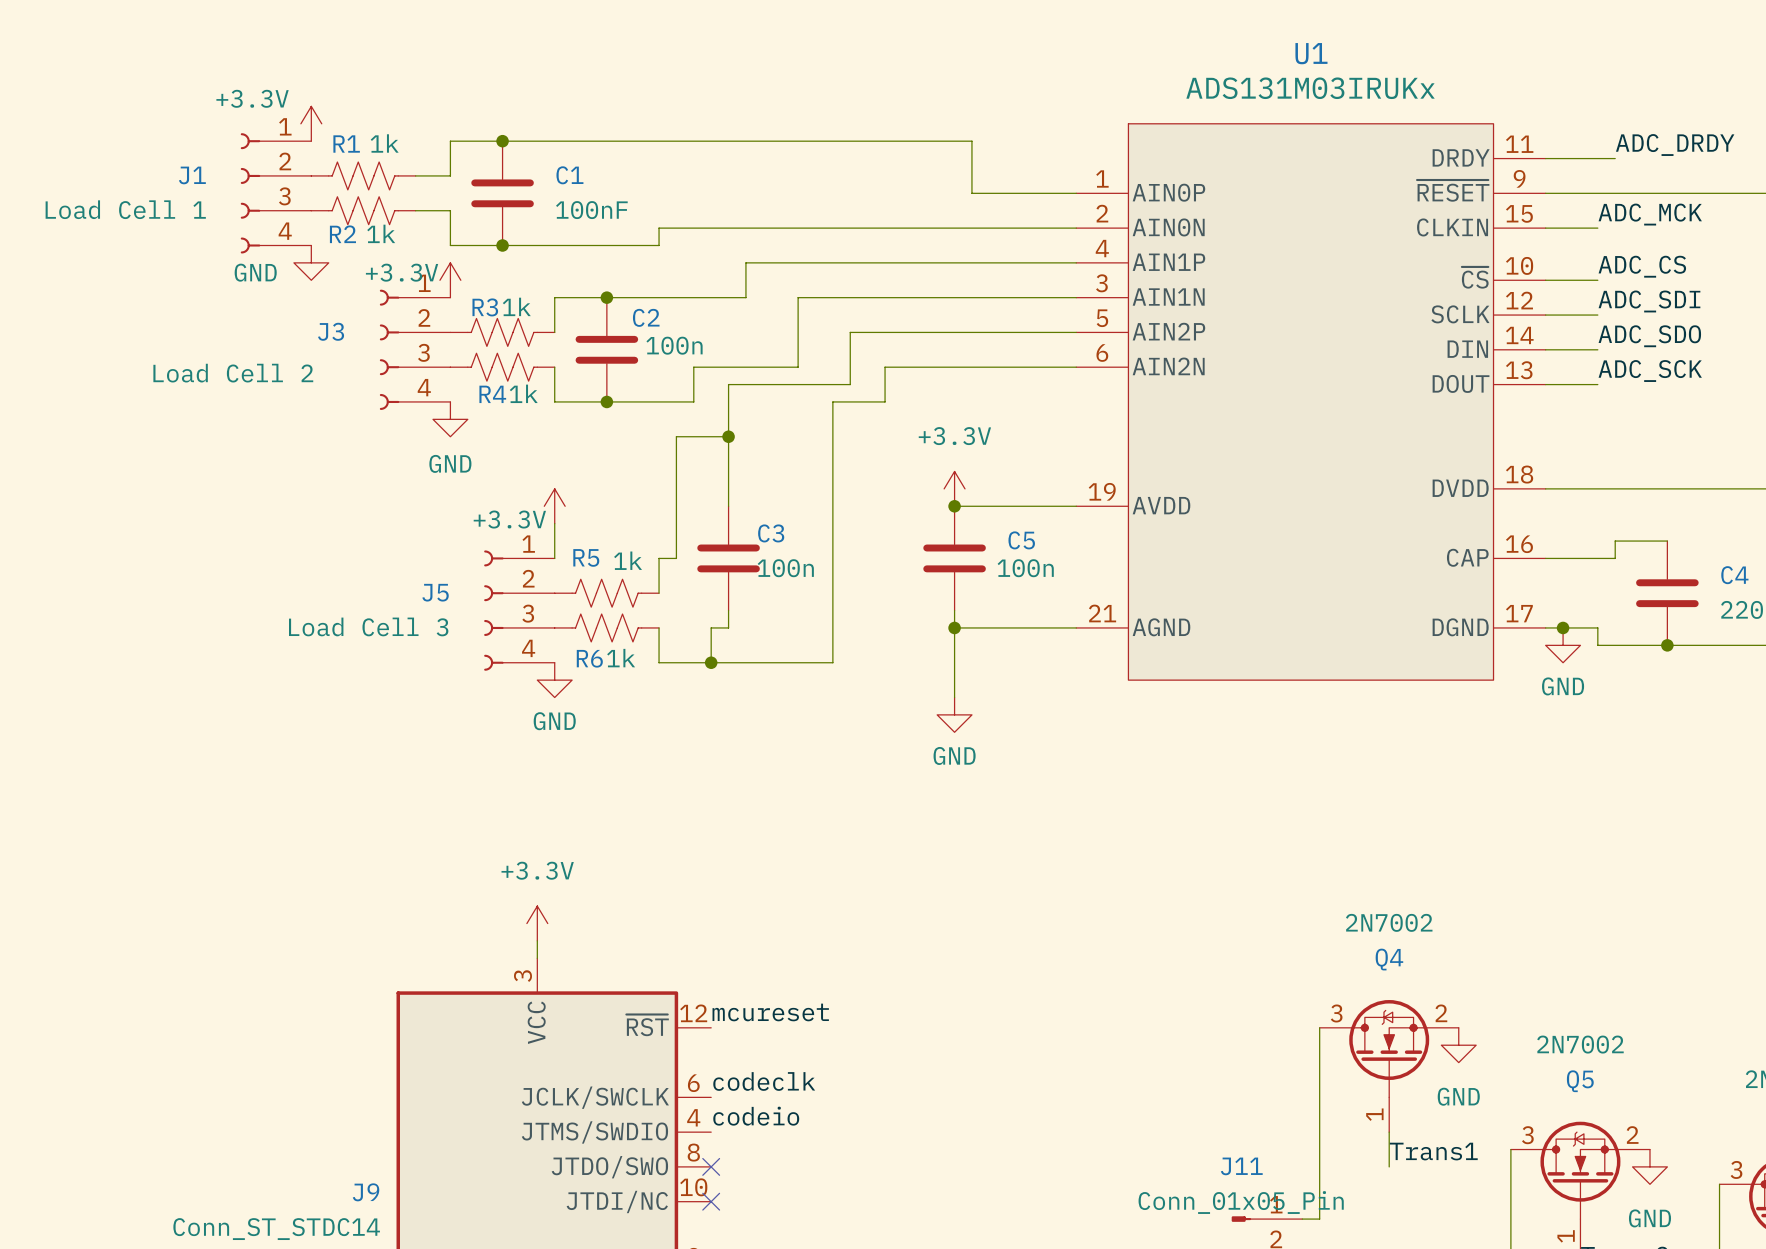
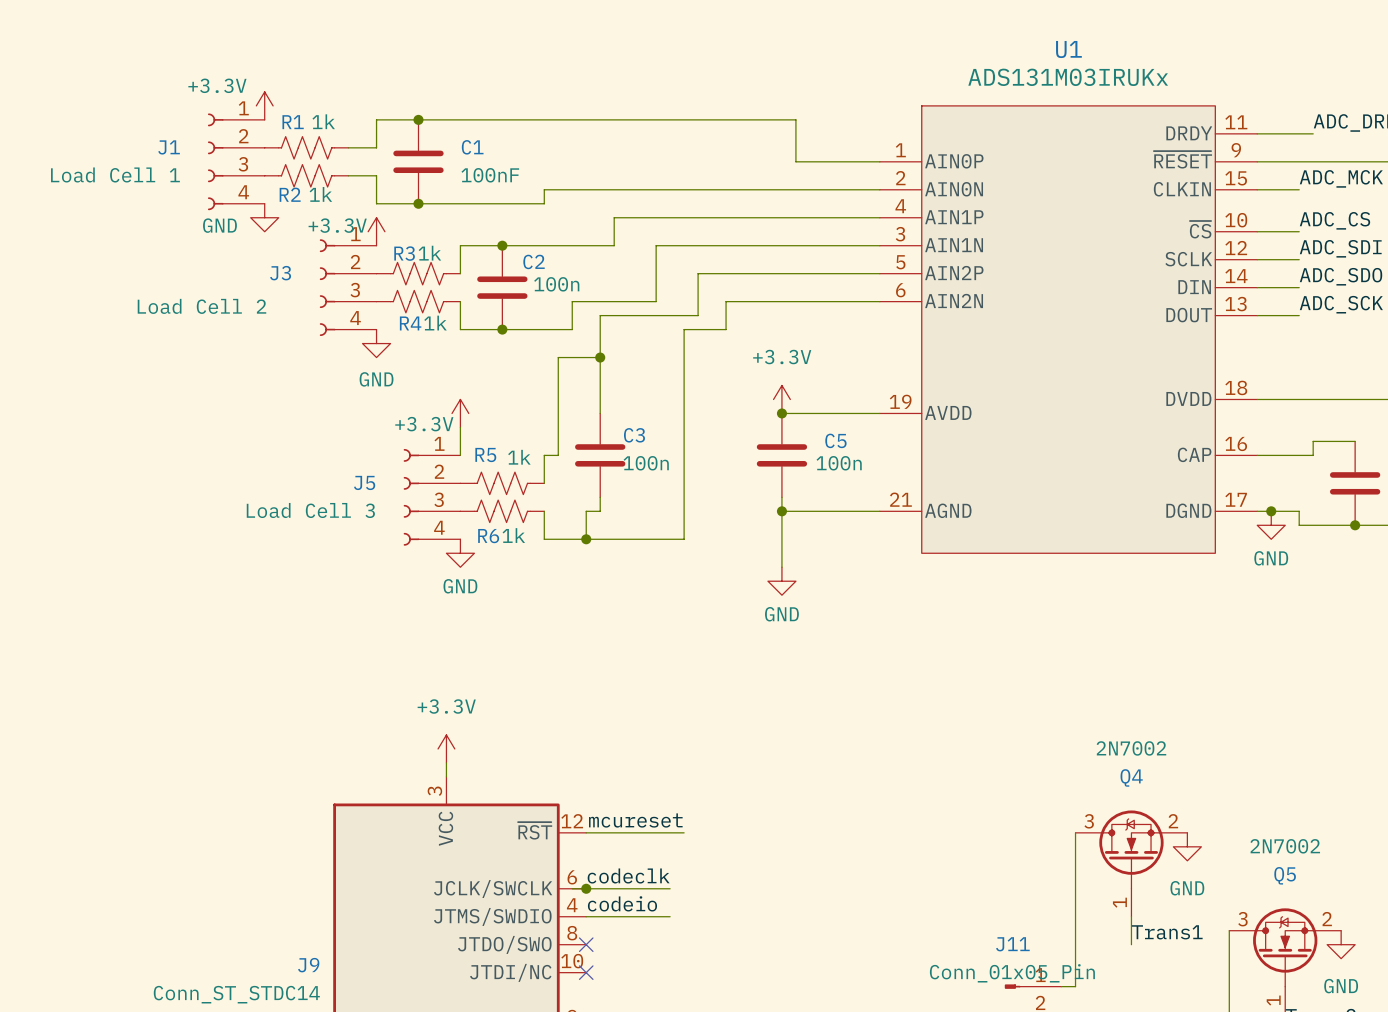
label position: mcureset (770, 1012) -> mcureset (635, 820)
wire: none -> (586, 832) (684, 832)
label position: codeclk (764, 1081) -> codeclk (628, 876)
wire: none -> (572, 888) (670, 888)
junction: none -> (586, 888)
wire: none -> (586, 916) (670, 916)

